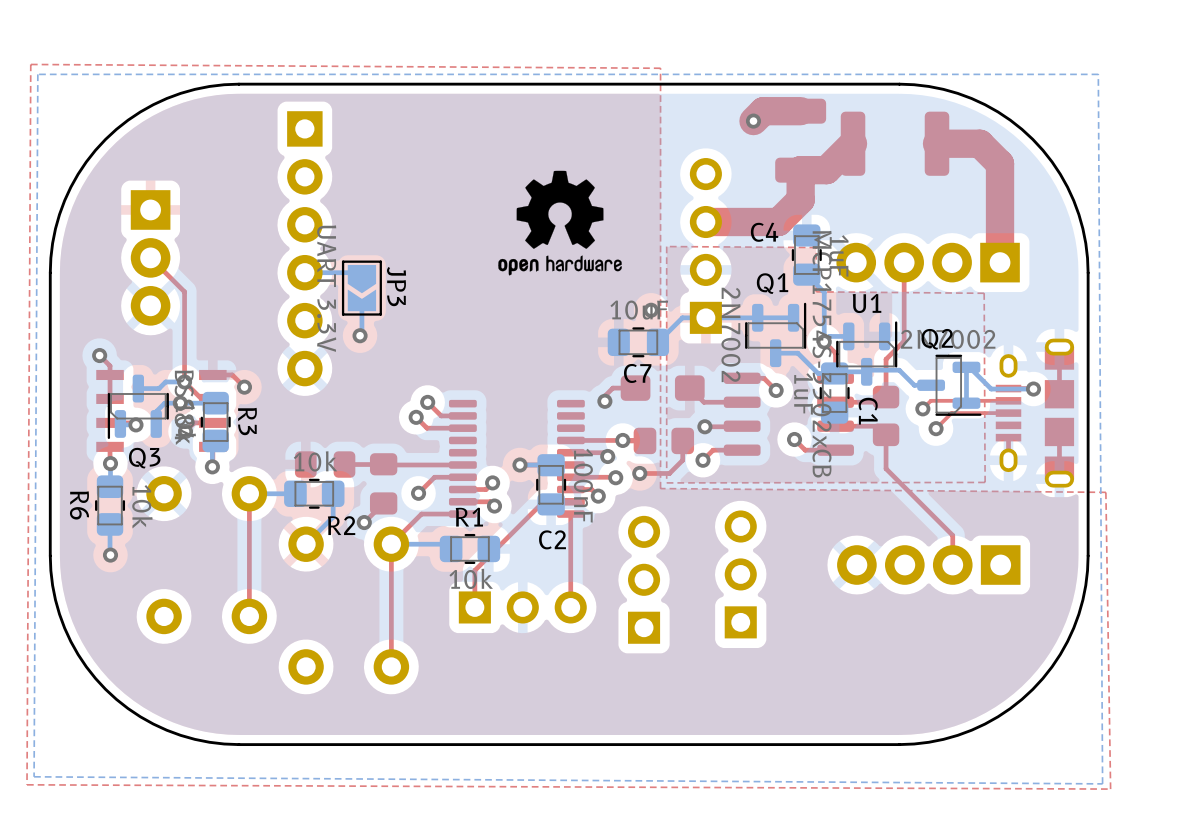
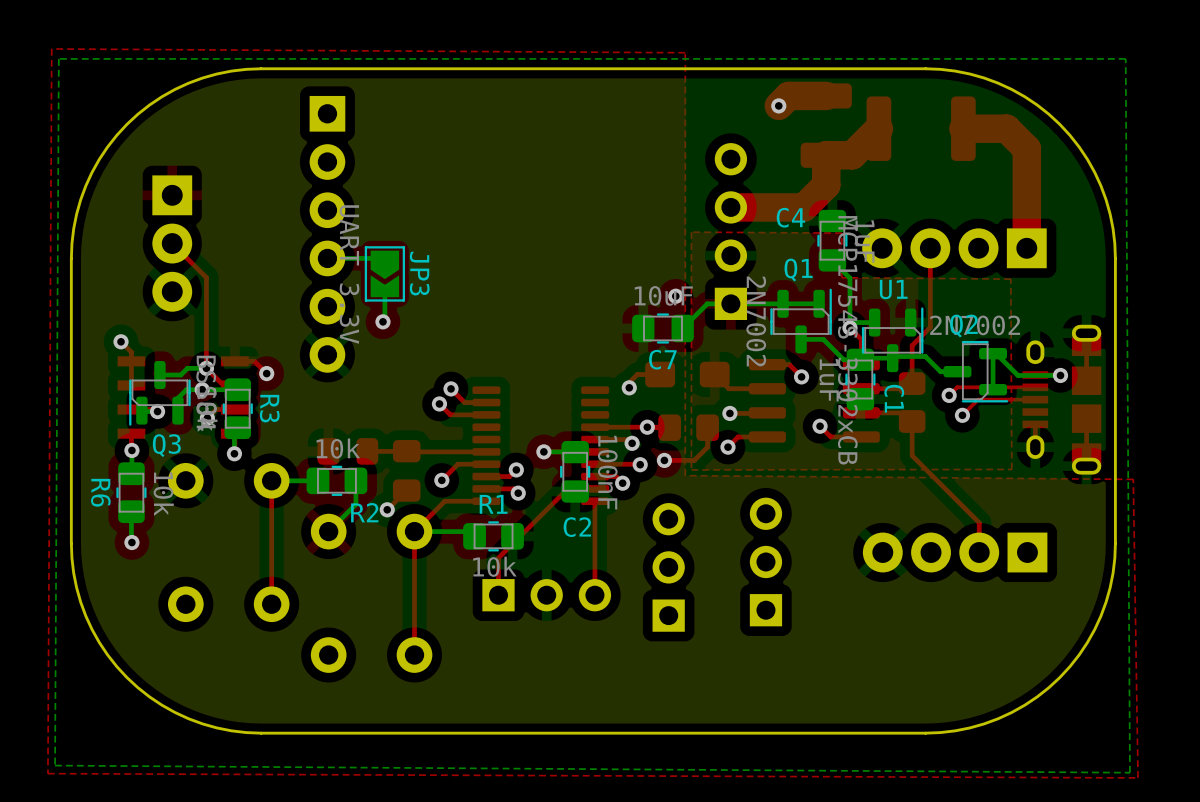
drawing: [498, 170, 622, 276] -> none

